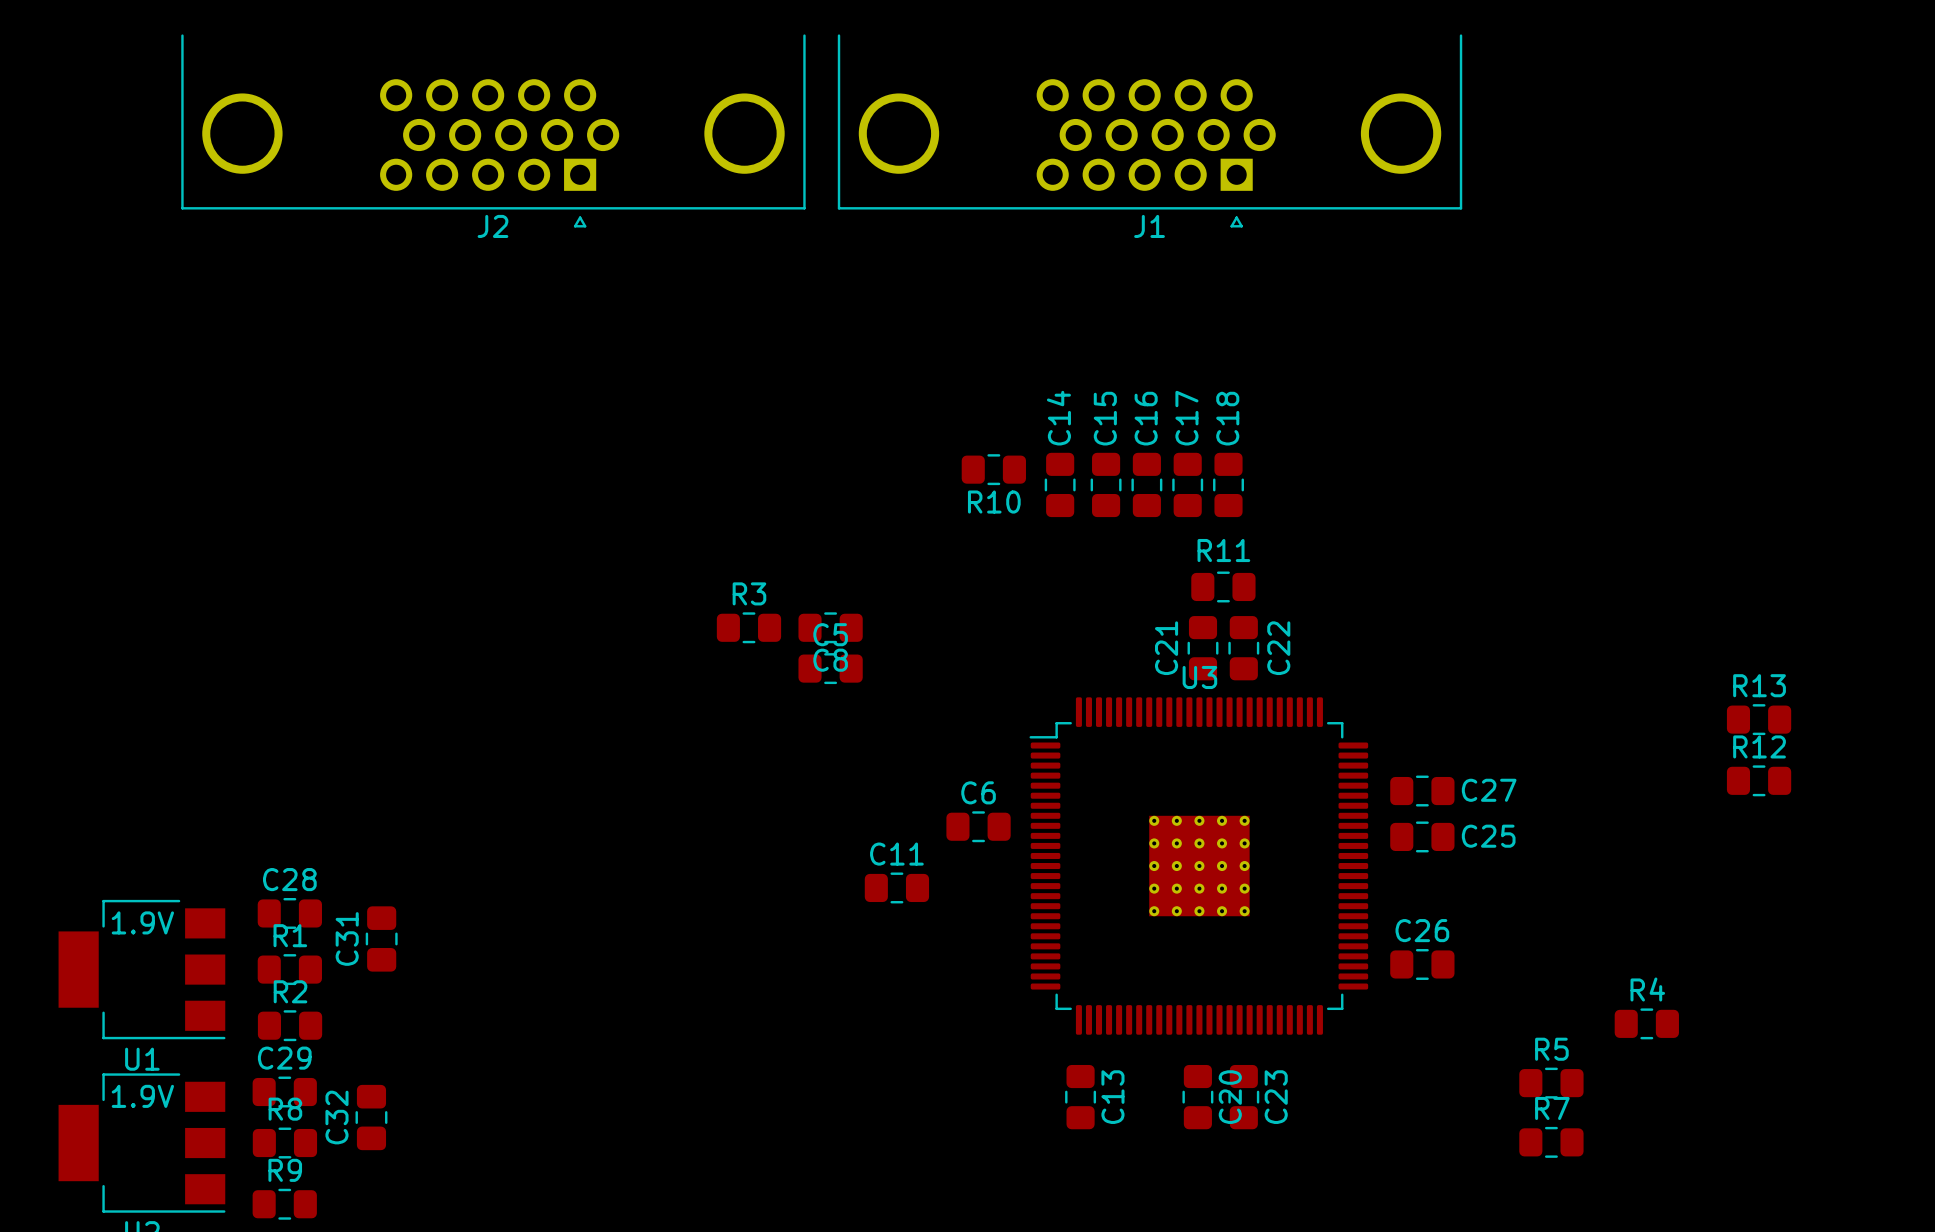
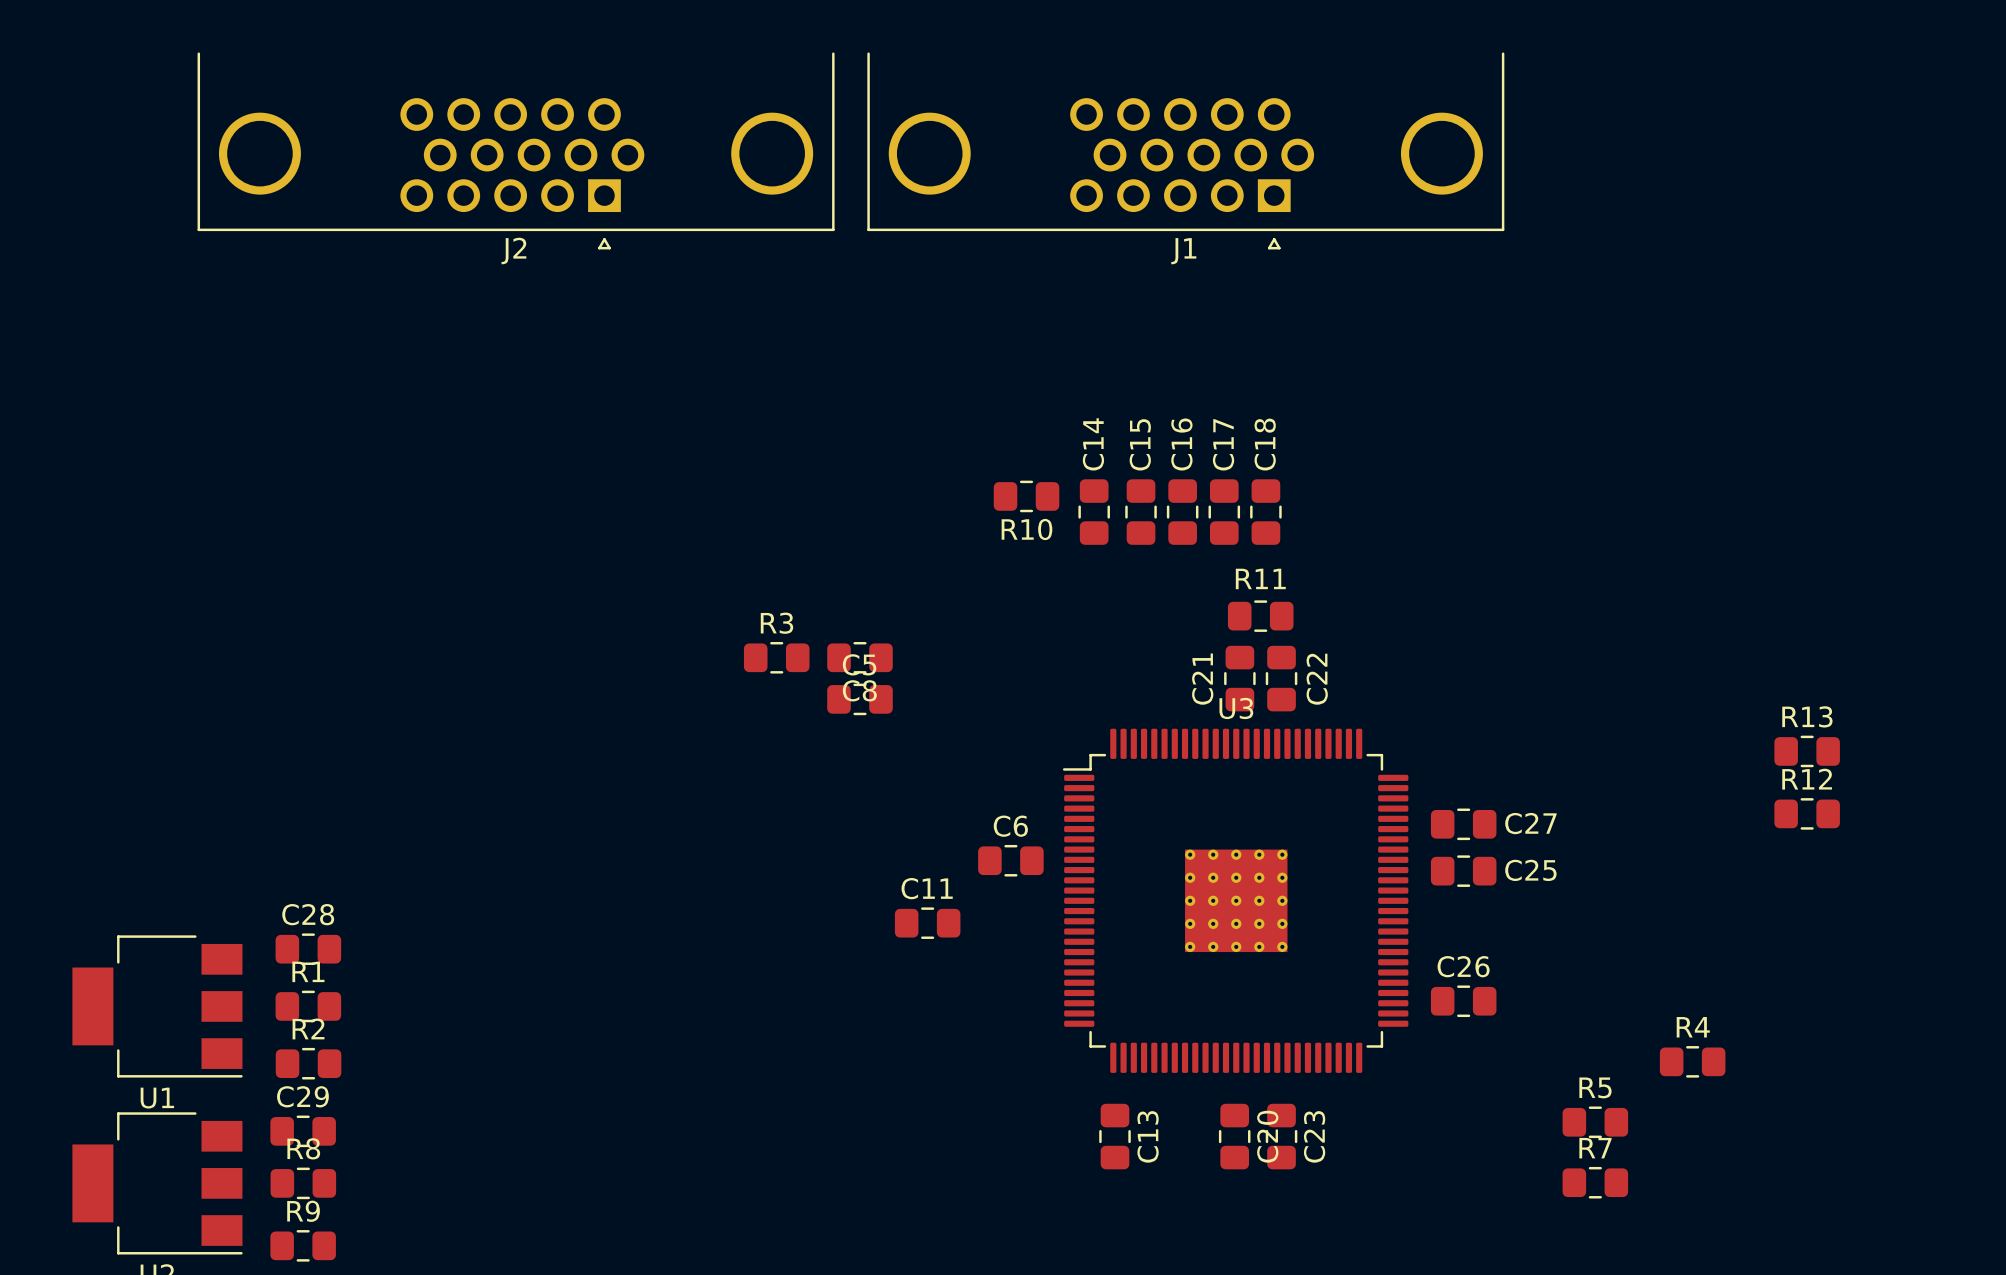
text: 1.9V (142, 922) -> none
C31: (381, 938) -> none
text: 1.9V (142, 1096) -> none
C32: (371, 1117) -> none

